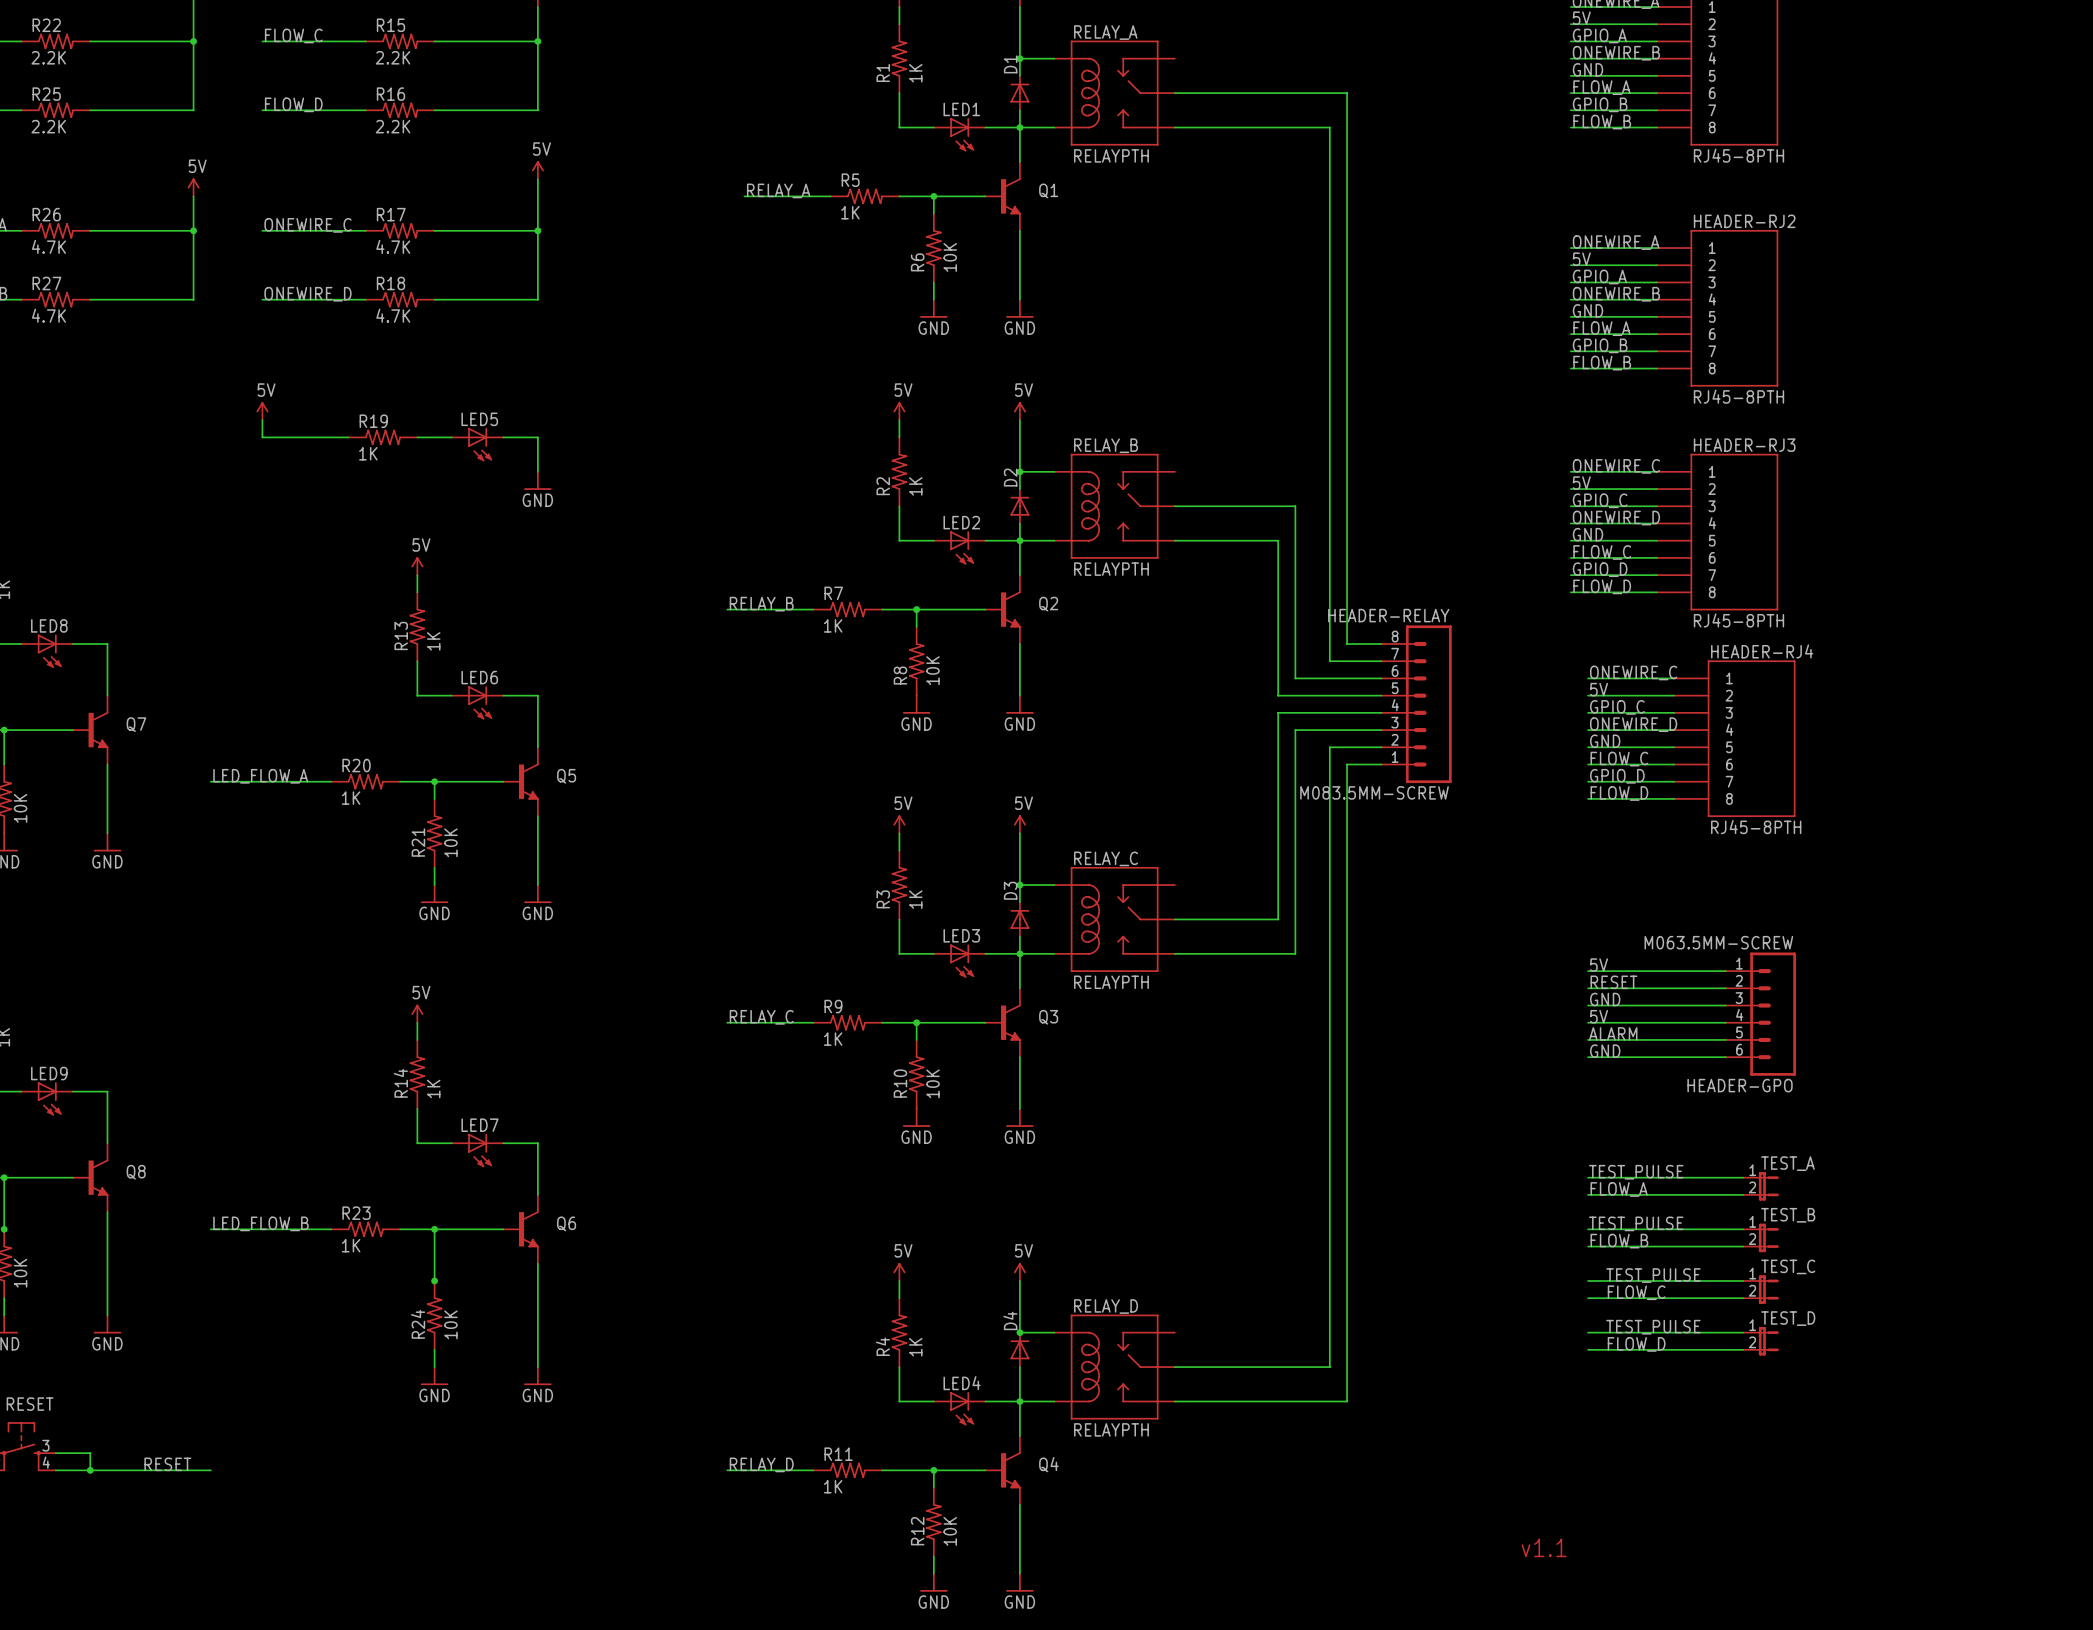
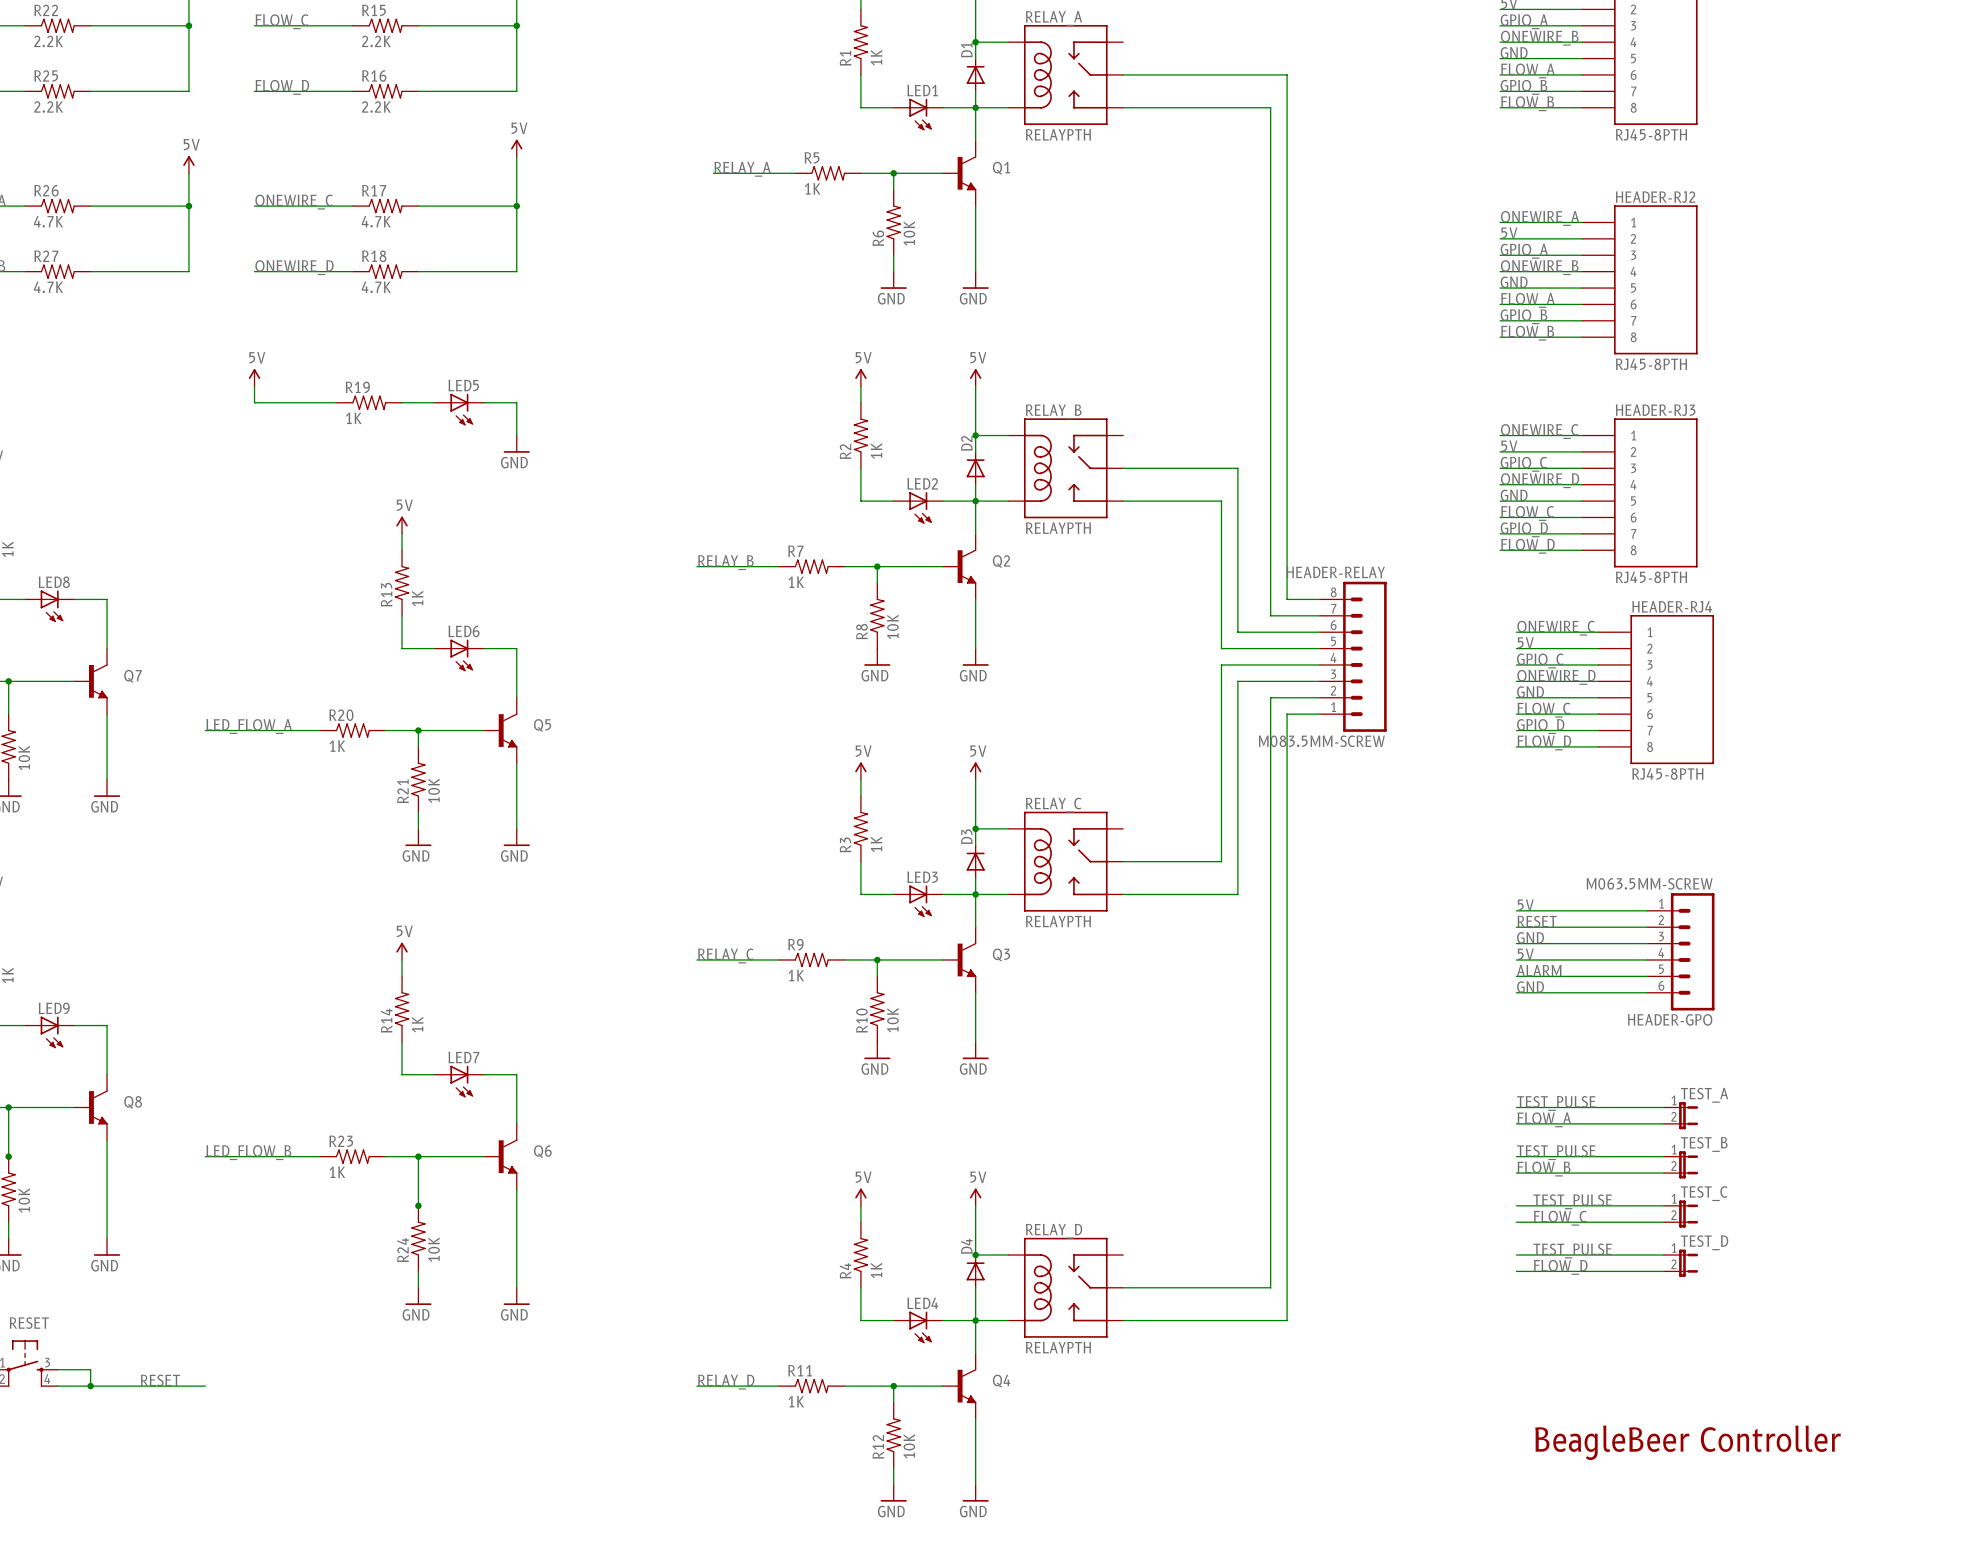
text: none -> BeagleBeer Controller (1687, 1442)
text: v1.1 (1544, 1547) -> none

